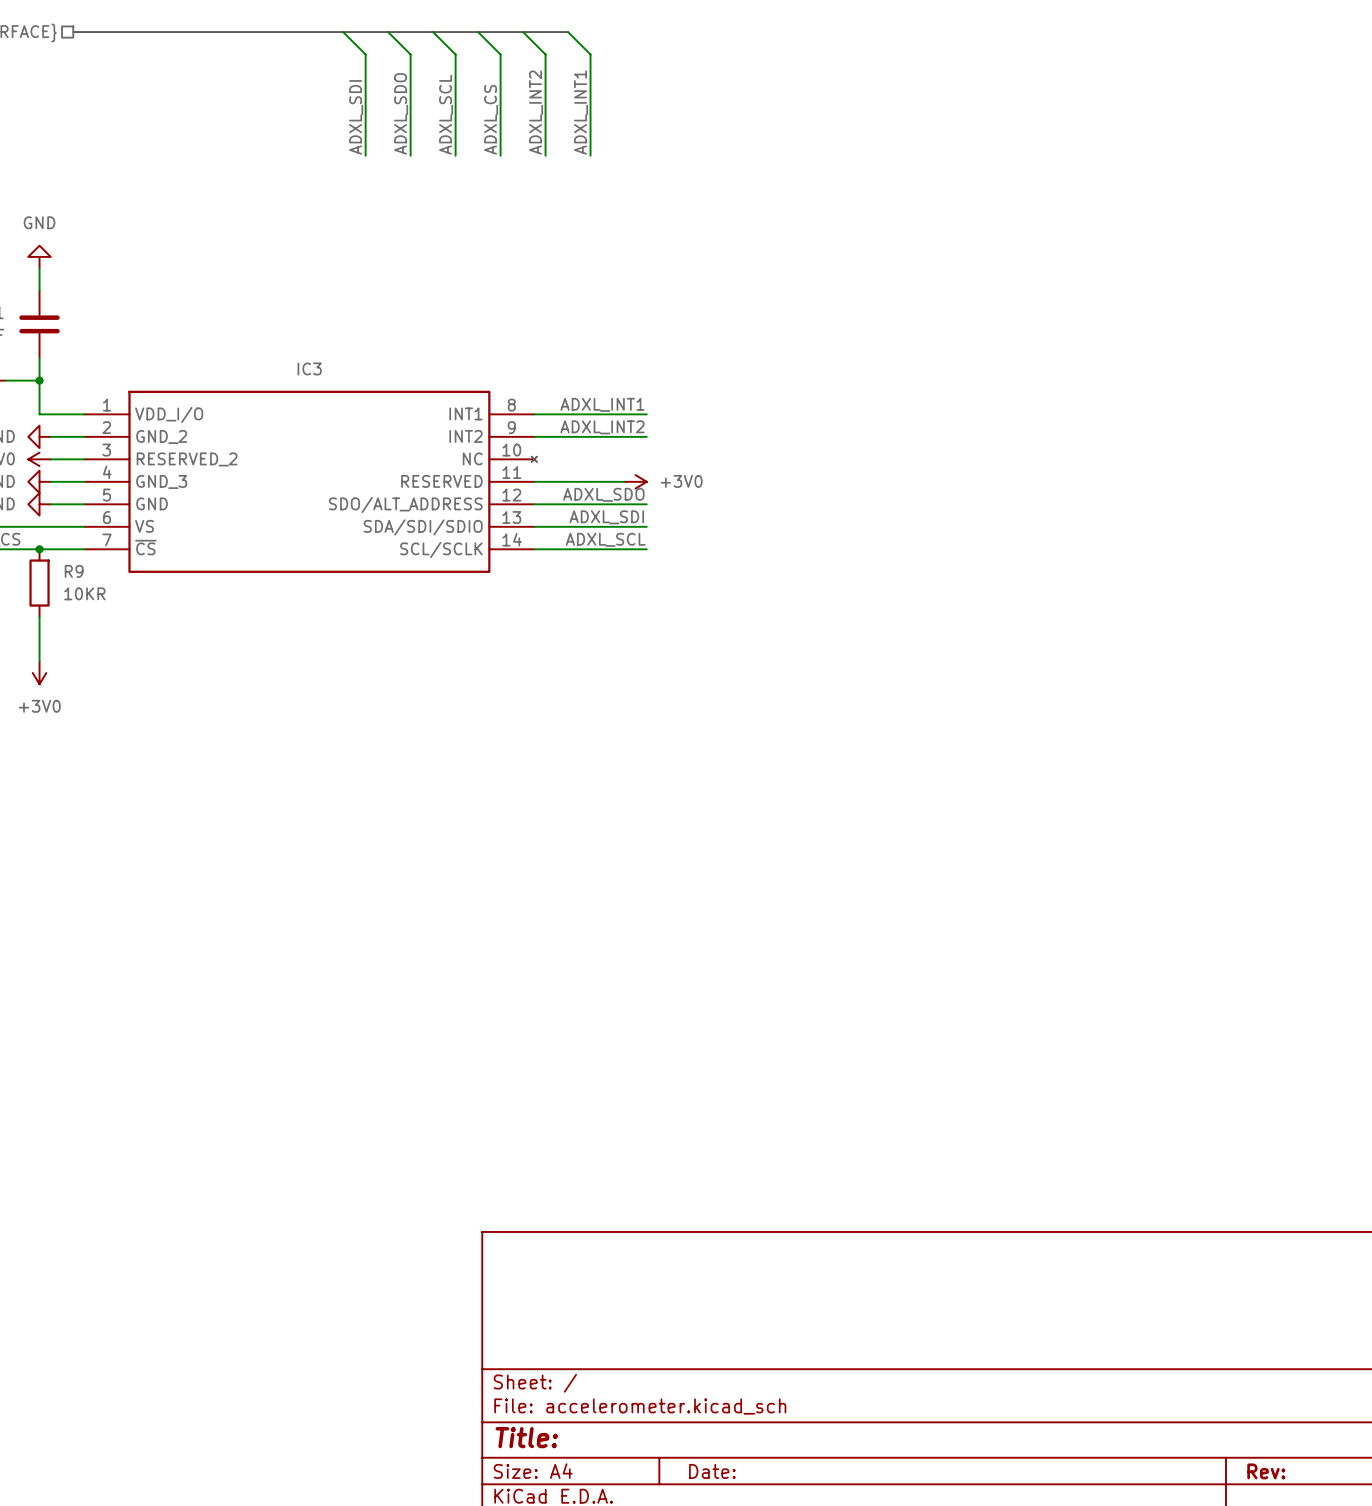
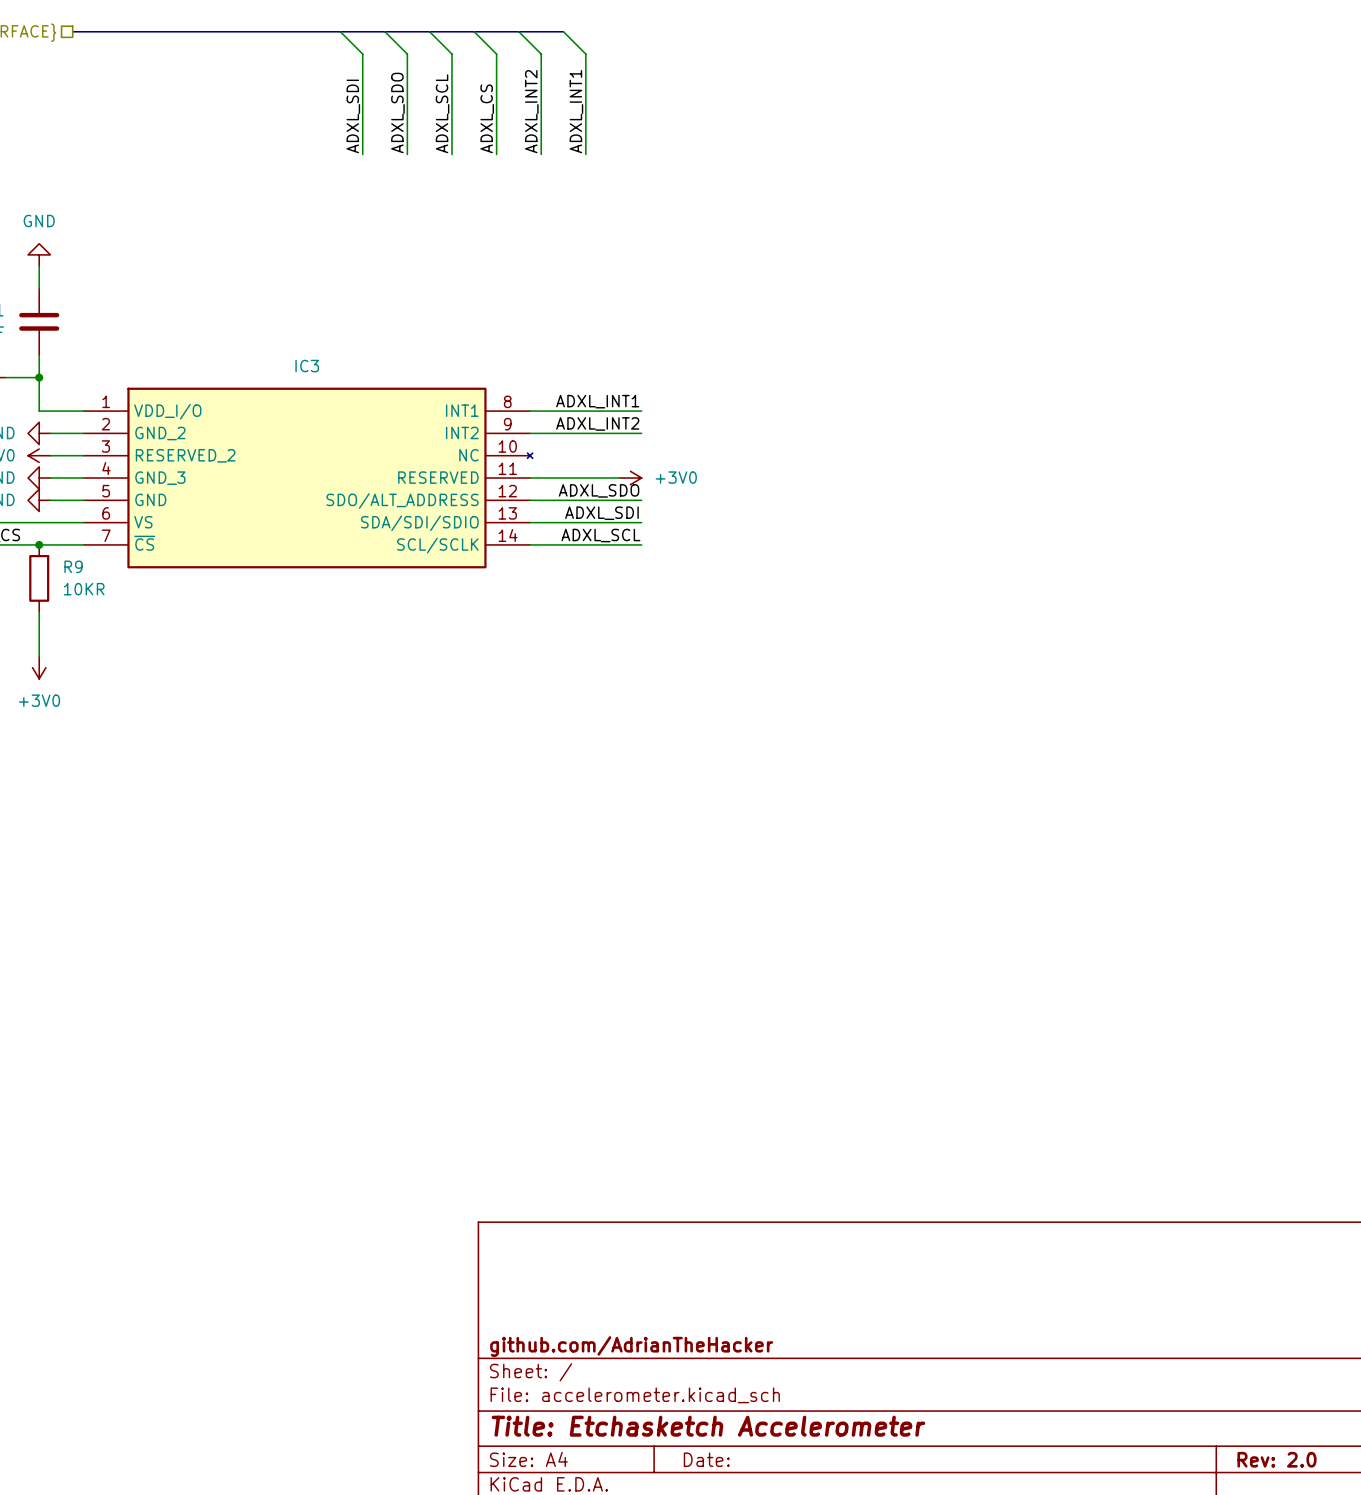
title block: none -> github.com/AdrianTheHacker (631, 1346)
title block: Title: (526, 1437) -> Title: Etchasketch Accelerometer (708, 1426)
title block: Rev: (1266, 1471) -> Rev: 2.0 (1276, 1459)

